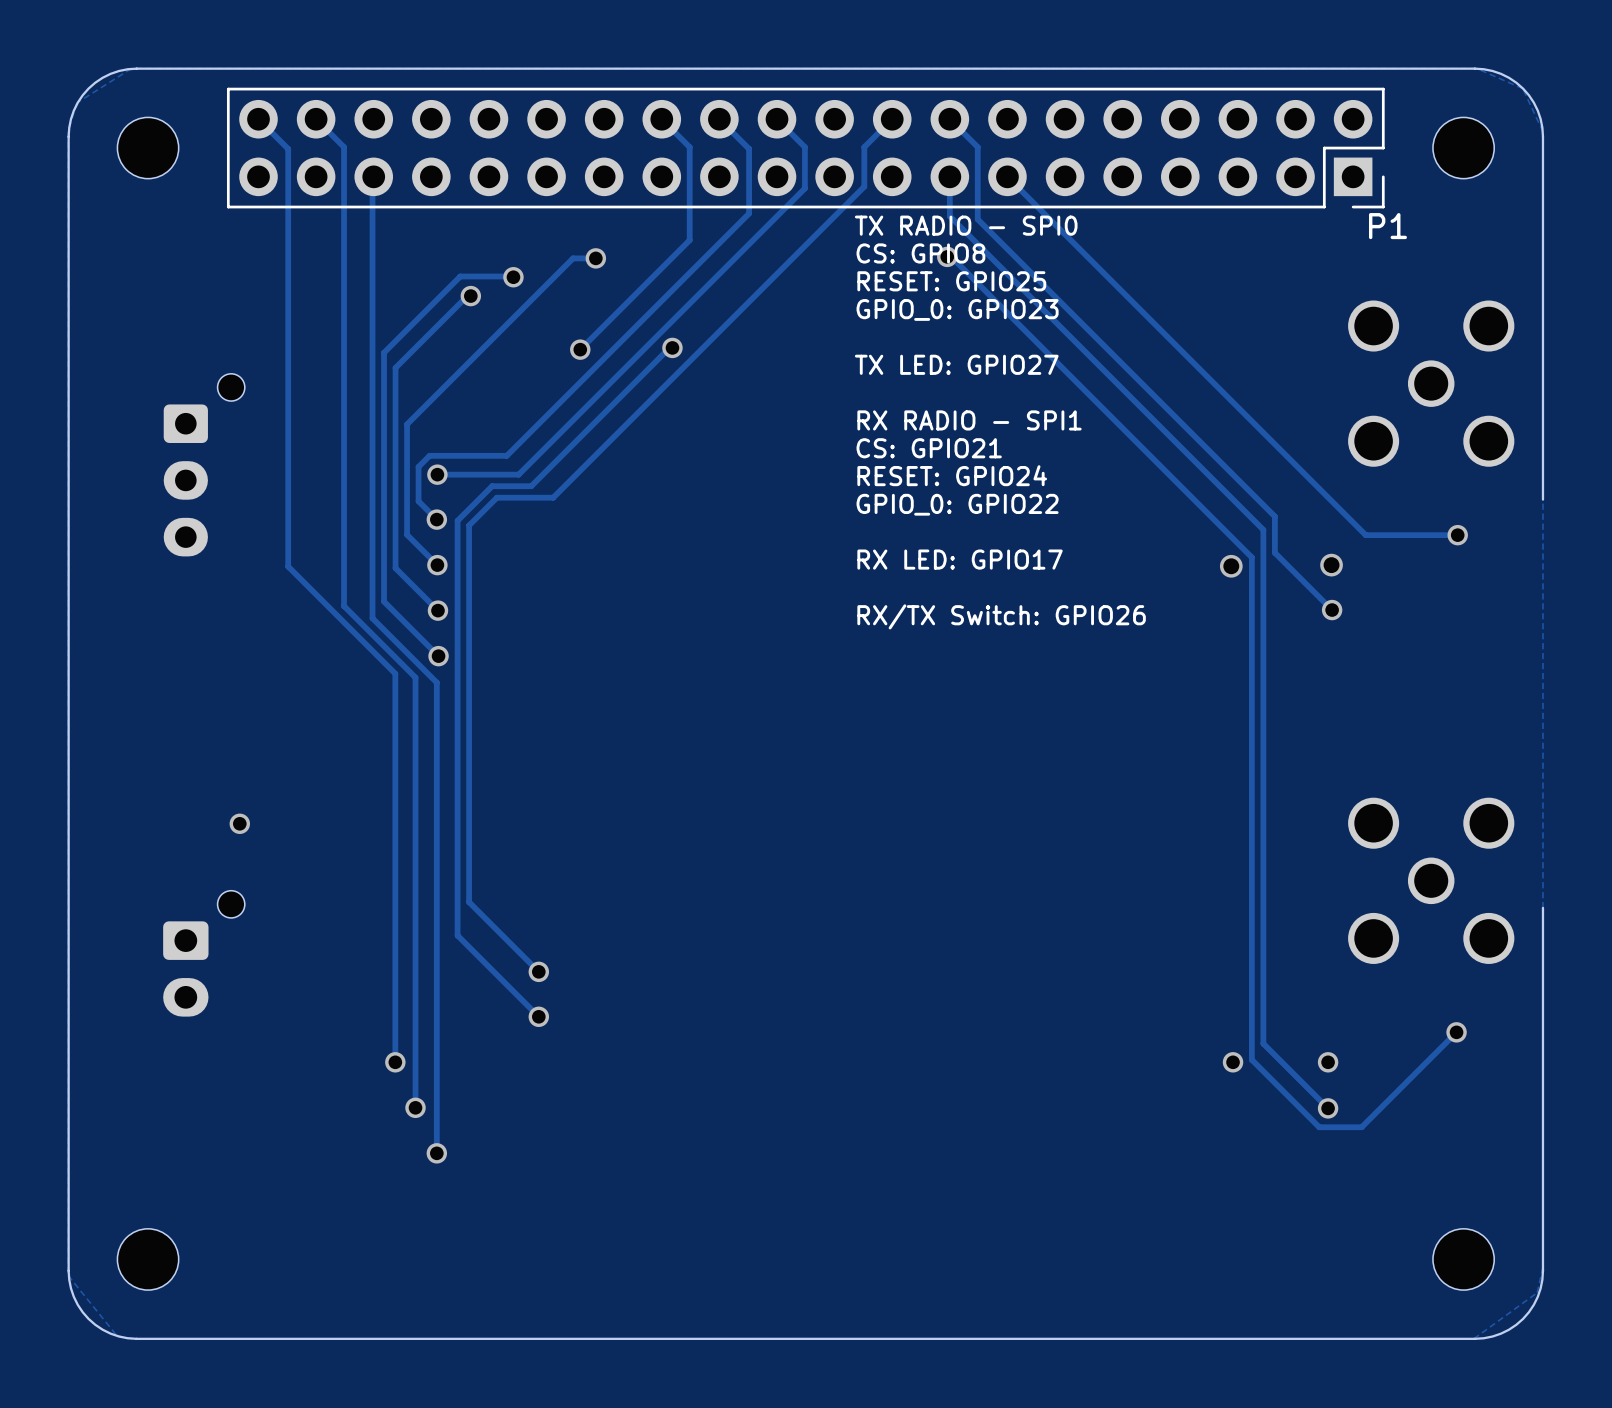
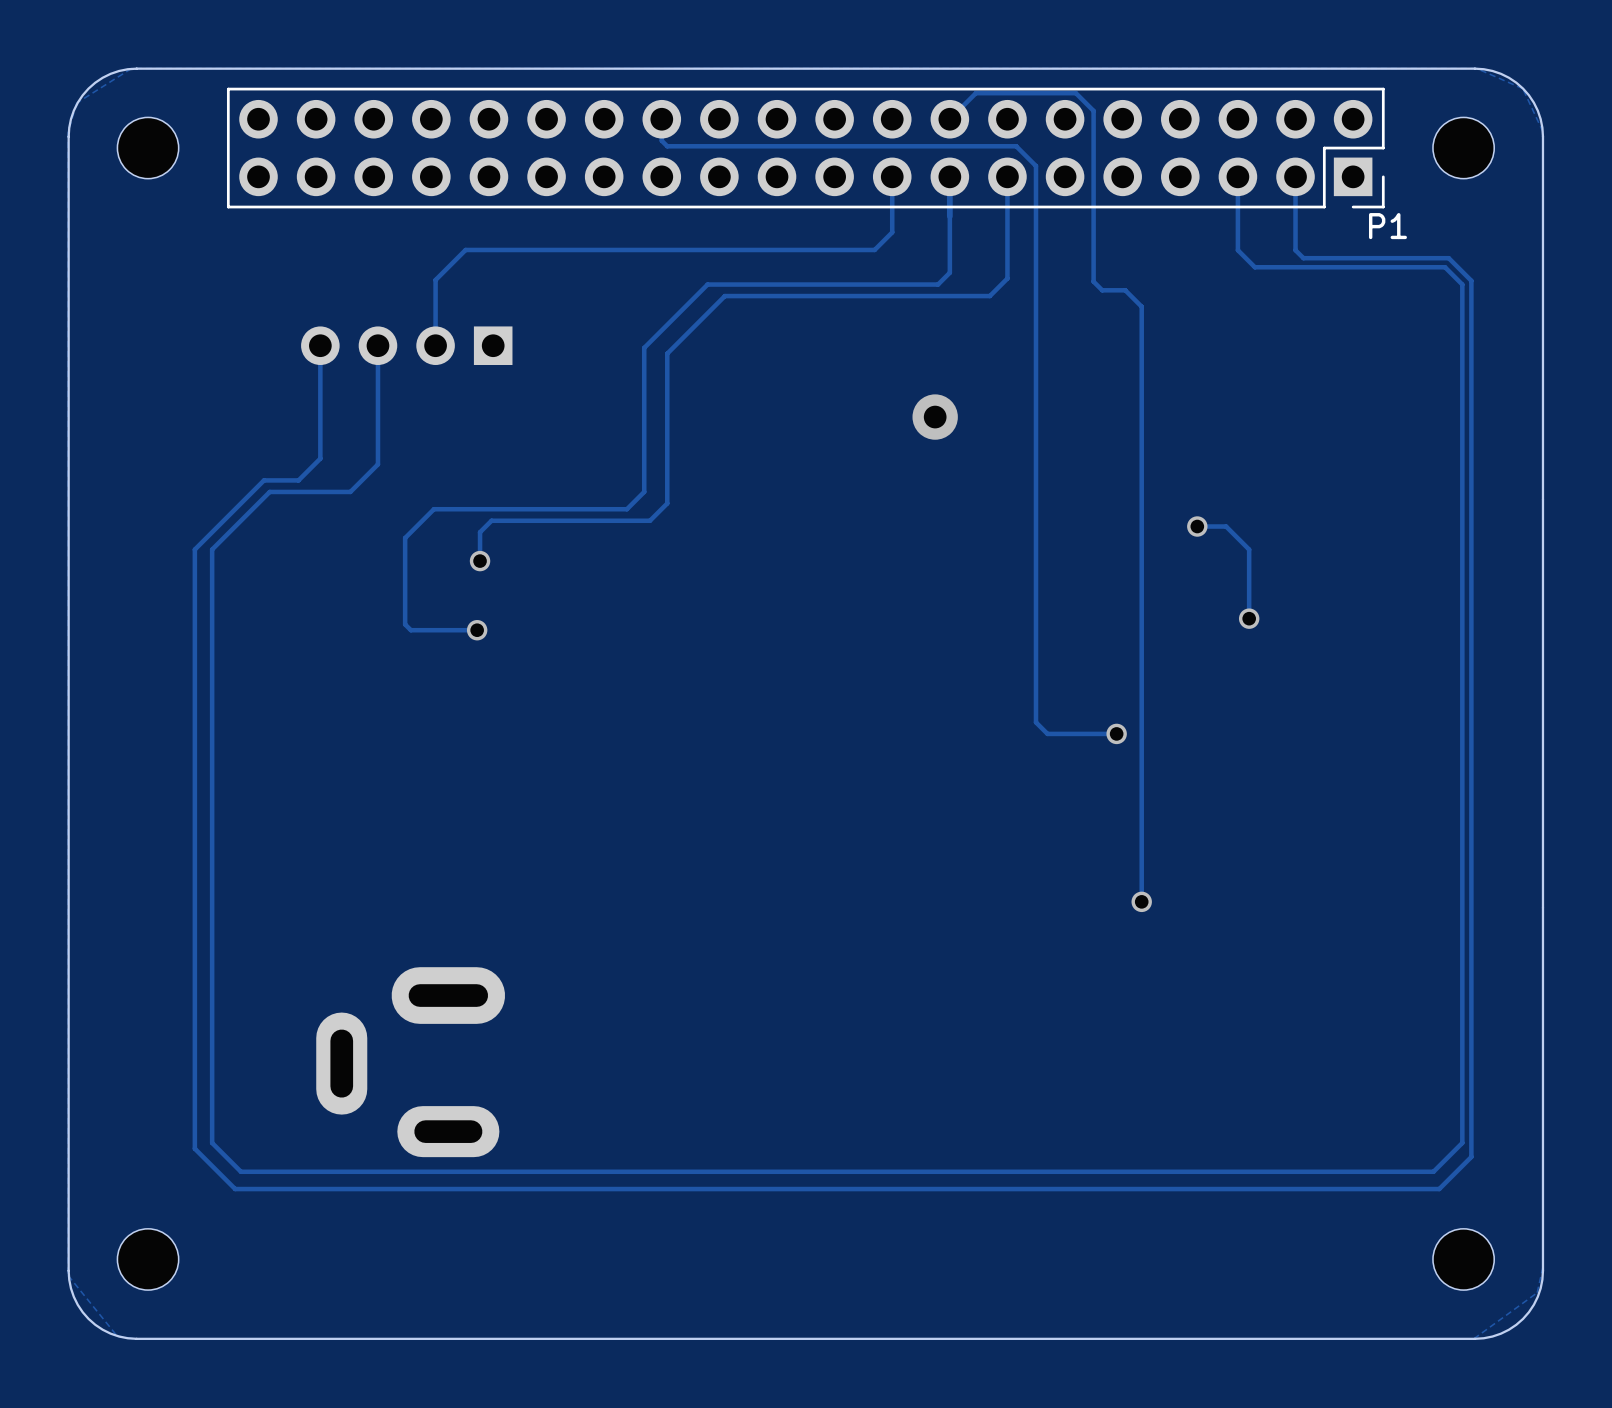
track: (258, 119) (288, 148) (288, 566) (395, 673) (395, 1062) -> none
track: (316, 119) (344, 147) (344, 606) (415, 677) (415, 1107) -> none
track: (661, 119) (689, 147) (689, 240) (580, 349) -> (661, 119) (661, 140) (667, 146) (1016, 146) (1035, 166) (1035, 722) (1047, 733) (1116, 733)
track: (719, 119) (749, 148) (749, 213) (506, 455) (429, 455) (418, 466) (418, 501) (436, 519) -> none
track: (777, 119) (804, 147) (804, 188) (518, 474) (437, 474) -> none
track: (892, 119) (864, 147) (864, 186) (553, 497) (496, 497) (469, 525) (469, 902) (538, 971) -> none
track: (949, 119) (977, 147) (977, 219) (1274, 516) (1274, 552) (1332, 610) -> (949, 119) (975, 93) (1075, 93) (1093, 110) (1093, 281) (1102, 290) (1125, 290) (1141, 306) (1141, 901)
track: (373, 176) (372, 618) (436, 682) (436, 1153) -> none
track: none -> (892, 176) (892, 232) (874, 249) (465, 249) (435, 280) (435, 345)
track: (1007, 176) (1365, 535) (1457, 535) -> (1007, 176) (1007, 278) (989, 296) (724, 296) (667, 353) (667, 503) (649, 520) (491, 520) (480, 532) (480, 561)
track: none -> (1237, 176) (1237, 250) (1254, 267) (1445, 267) (1462, 284) (1462, 1142) (1433, 1171) (240, 1171) (212, 1142) (212, 549) (269, 491) (350, 491) (377, 464) (377, 345)
track: none -> (1295, 176) (1295, 250) (1303, 258) (1448, 258) (1471, 280) (1471, 1156) (1439, 1189) (235, 1189) (194, 1148) (194, 549) (263, 480) (298, 480) (320, 458) (320, 345)
track: (949, 216) (1263, 529) (1263, 1043) (1328, 1108) -> (949, 216) (949, 272) (938, 284) (707, 284) (644, 347) (644, 491) (626, 509) (433, 509) (405, 538) (405, 624) (410, 630) (477, 630)
text: TX RADIO - SPI0 (966, 225) -> none
text: CS: GPIO8 (920, 253) -> none
track: (947, 256) (951, 256) (1251, 557) (1251, 1059) (1319, 1127) (1361, 1127) (1456, 1032) -> none
via: (947, 256) -> none
track: (595, 258) (573, 258) (407, 424) (407, 534) (437, 565) -> none
via: (595, 258) -> none
track: (513, 277) (460, 276) (384, 352) (384, 601) (438, 656) -> none
via: (513, 277) -> none
text: RESET: GPIO25 (951, 281) -> none
track: (470, 296) (467, 296) (395, 367) (395, 568) (437, 610) -> none
via: (470, 296) -> none
text: GPIO_0: GPIO23 (957, 309) -> none
part: none -> (406, 345)
track: (672, 347) (669, 347) (531, 486) (492, 486) (457, 520) (457, 935) (538, 1016) -> none
via: (672, 347) -> none
via: (580, 349) -> none
text: TX LED: GPIO27 (956, 364) -> none
part: (1431, 383) -> none
via: none -> (935, 417)
text: RX RADIO - SPI1 (969, 420) -> none
text: CS: GPIO21 (929, 448) -> none
part: (204, 465) -> none
via: (437, 474) -> none
text: RESET: GPIO24 (952, 475) -> none
board edge: none -> (1542, 499) (1542, 907)
text: GPIO_0: GPIO22 (957, 504) -> none
via: (436, 519) -> none
track: none -> (1197, 526) (1226, 526) (1249, 549) (1249, 618)
via: none -> (1197, 526)
via: (1457, 535) -> none
text: RX LED: GPIO17 (960, 559) -> none
via: none -> (480, 561)
via: (437, 565) -> none
via: (1331, 565) -> none
via: (1231, 566) -> none
via: (437, 610) -> none
via: (1332, 610) -> none
text: RX/TX Switch: GPIO26 (1001, 616) -> none
via: none -> (1249, 618)
via: none -> (477, 630)
via: (438, 656) -> none
via: none -> (1116, 733)
via: (239, 823) -> none
part: (1431, 880) -> none
via: none -> (1141, 901)
part: (203, 953) -> none
via: (538, 971) -> none
via: (538, 1016) -> none
via: (1456, 1032) -> none
via: (395, 1062) -> none
part: none -> (410, 1062)
via: (1233, 1062) -> none
via: (1328, 1062) -> none
via: (415, 1107) -> none
via: (1328, 1108) -> none
via: (436, 1153) -> none

